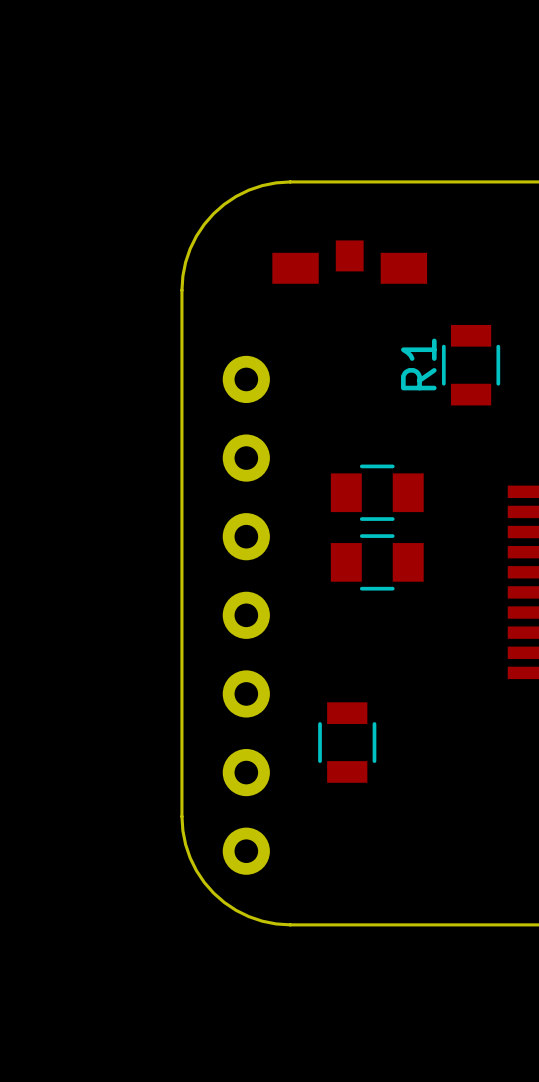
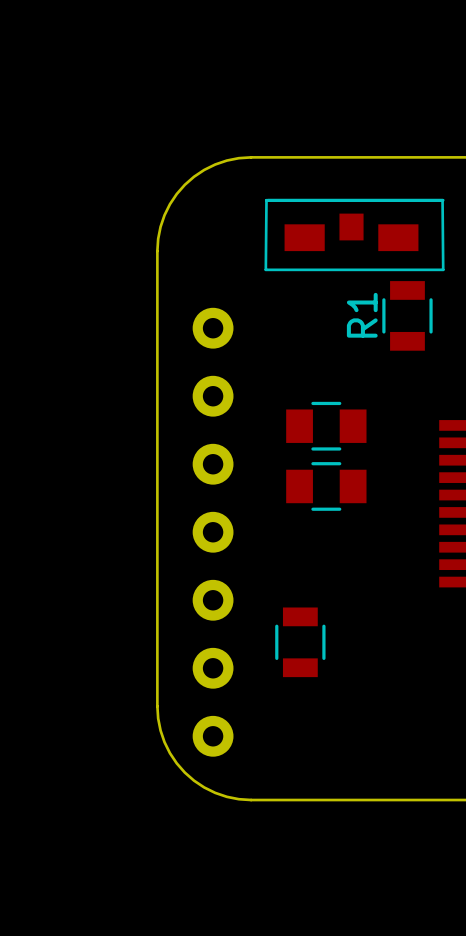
part: (349, 262) -> none
part: none -> (354, 235)

